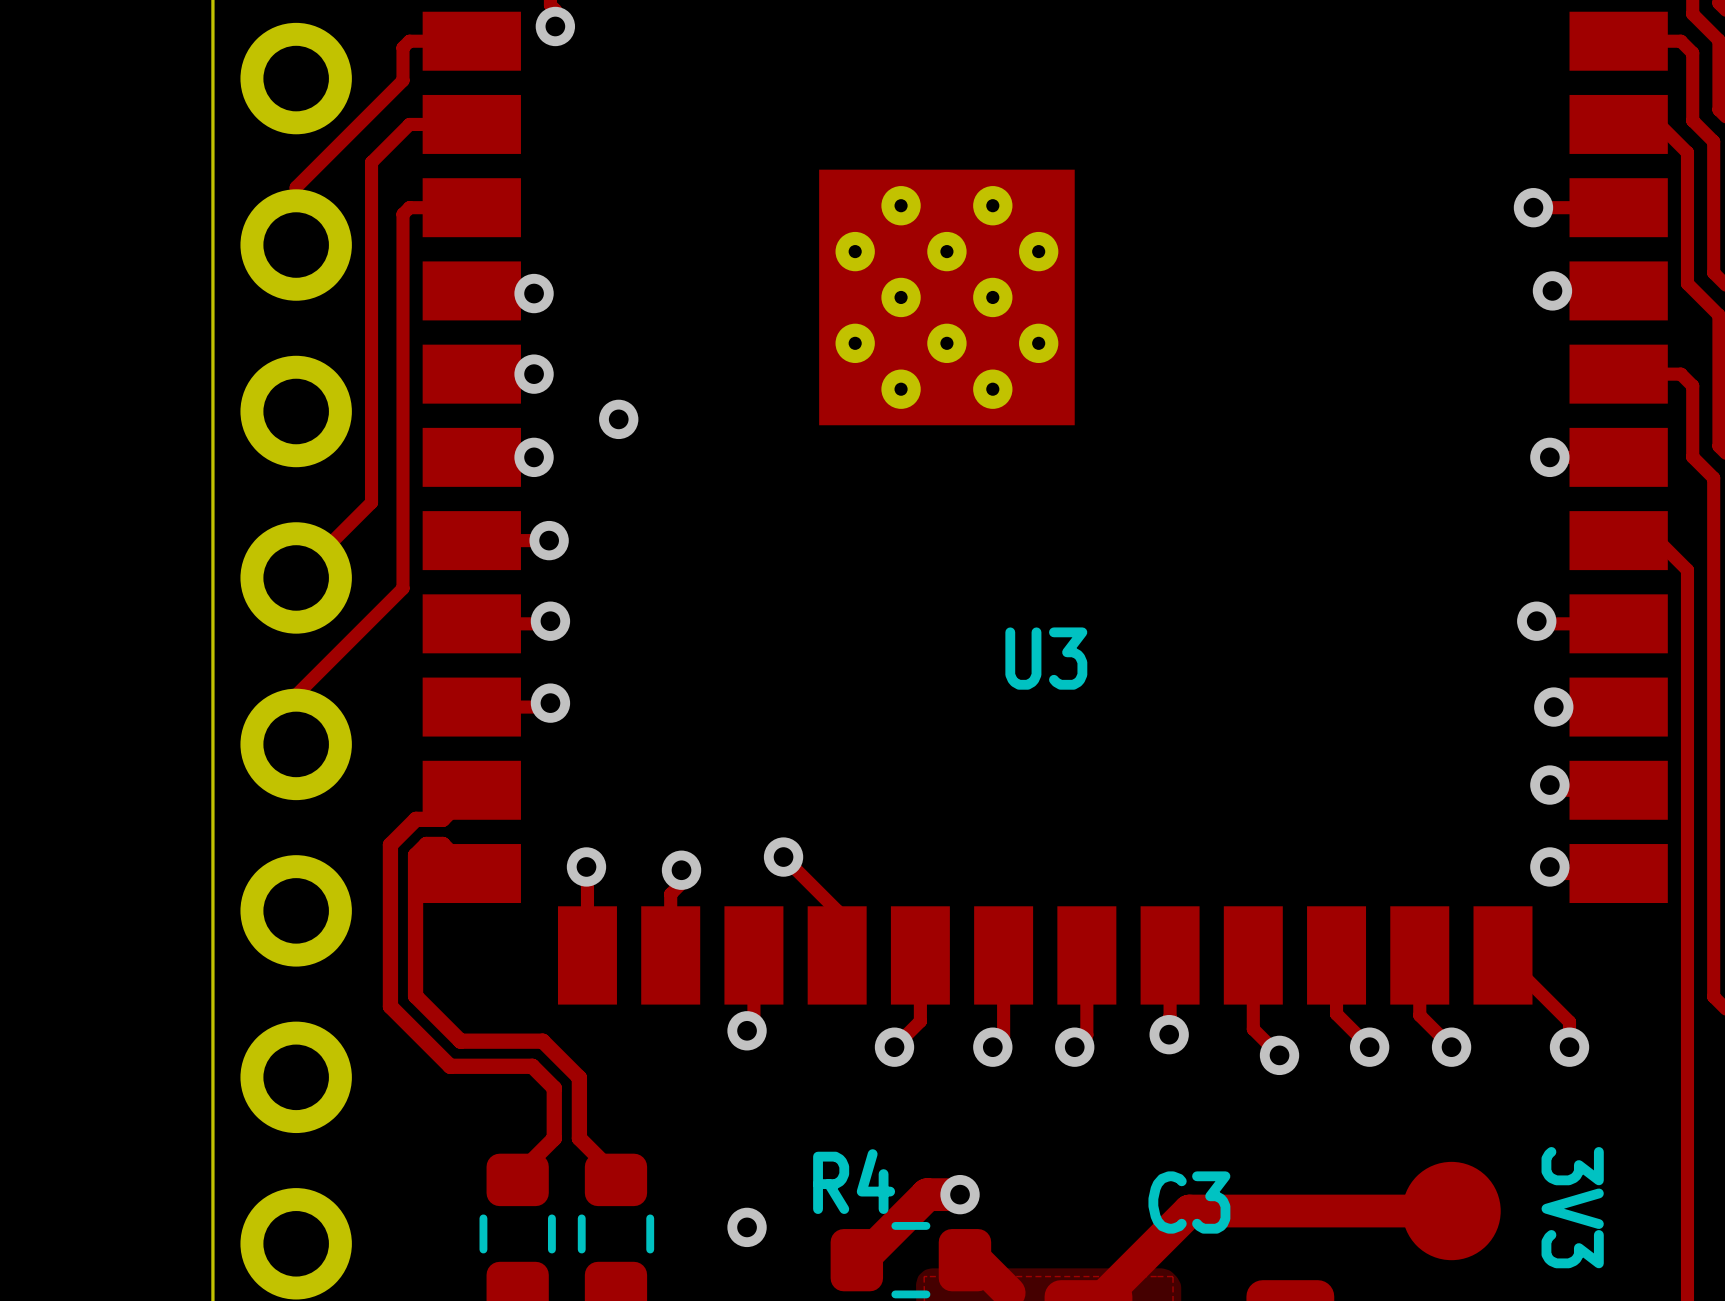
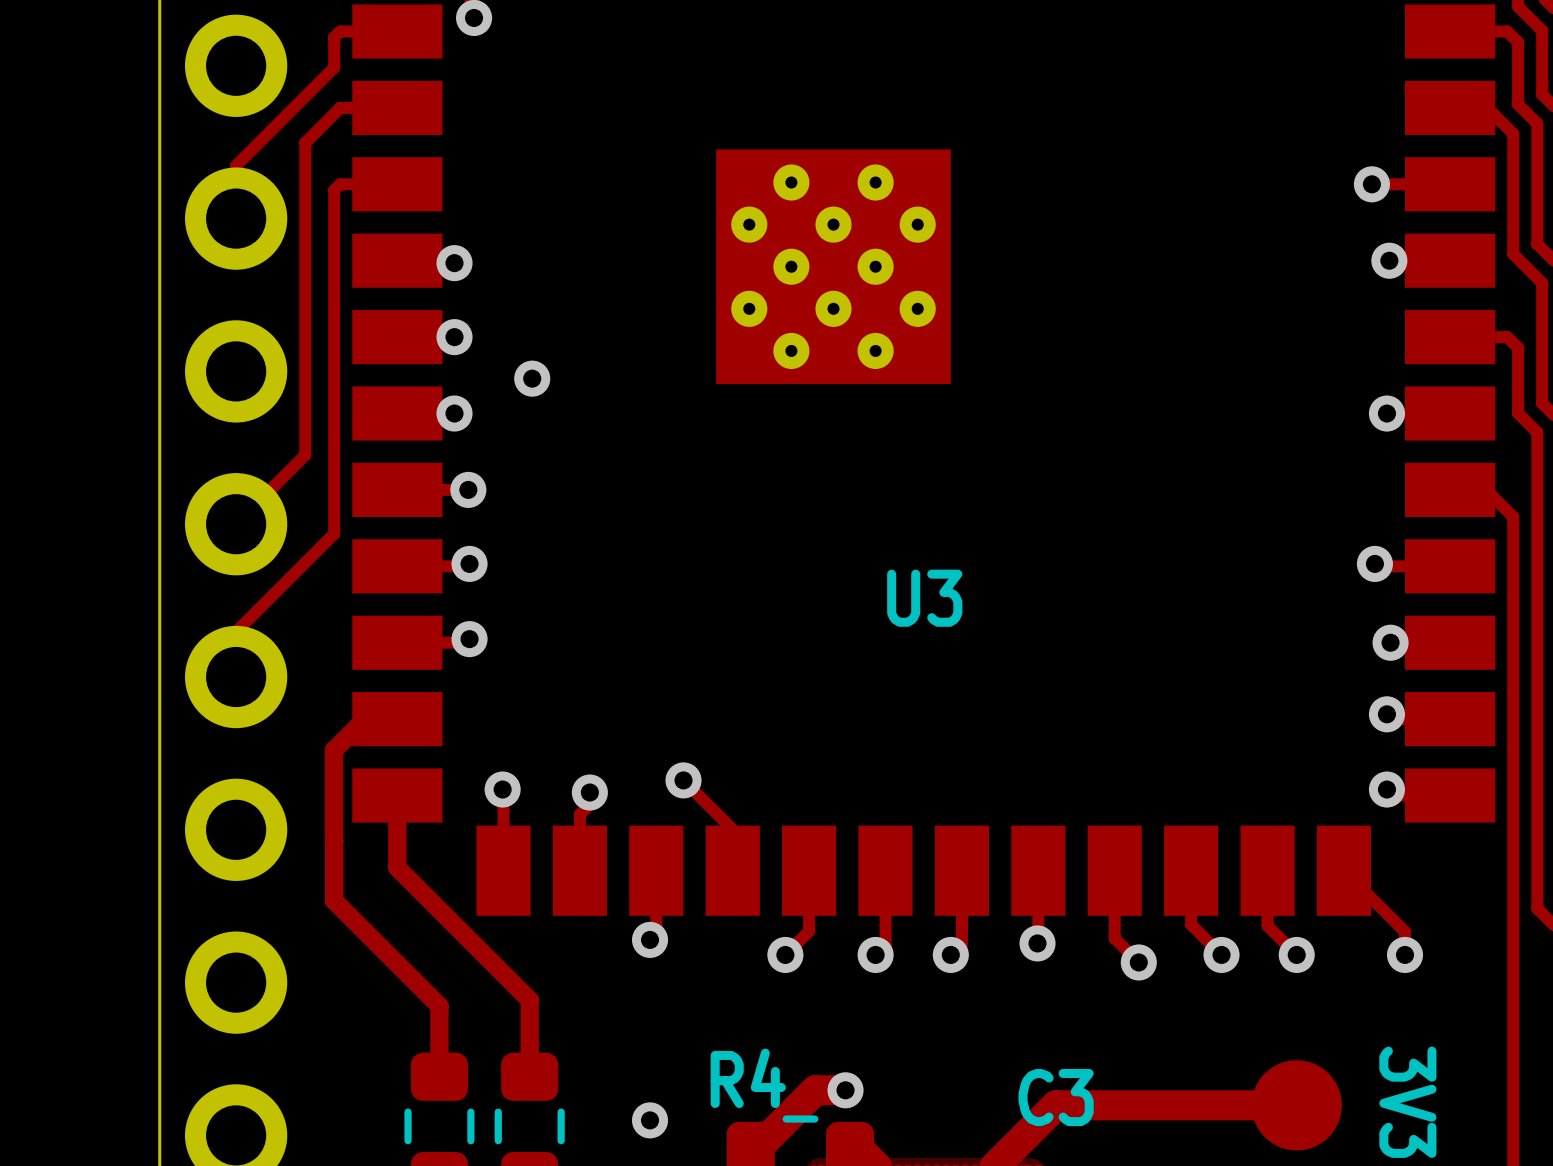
track: (471, 790) (442, 819) (415, 819) (390, 844) (390, 1006) (450, 1066) (532, 1066) (554, 1088) (554, 1138) (517, 1174) -> (397, 719) (365, 719) (334, 750) (334, 900) (439, 1006) (439, 1072)
track: (471, 873) (442, 844) (426, 844) (415, 855) (415, 996) (460, 1041) (542, 1041) (579, 1077) (579, 1138) (615, 1174) -> (397, 795) (397, 867) (529, 1000) (529, 1072)

